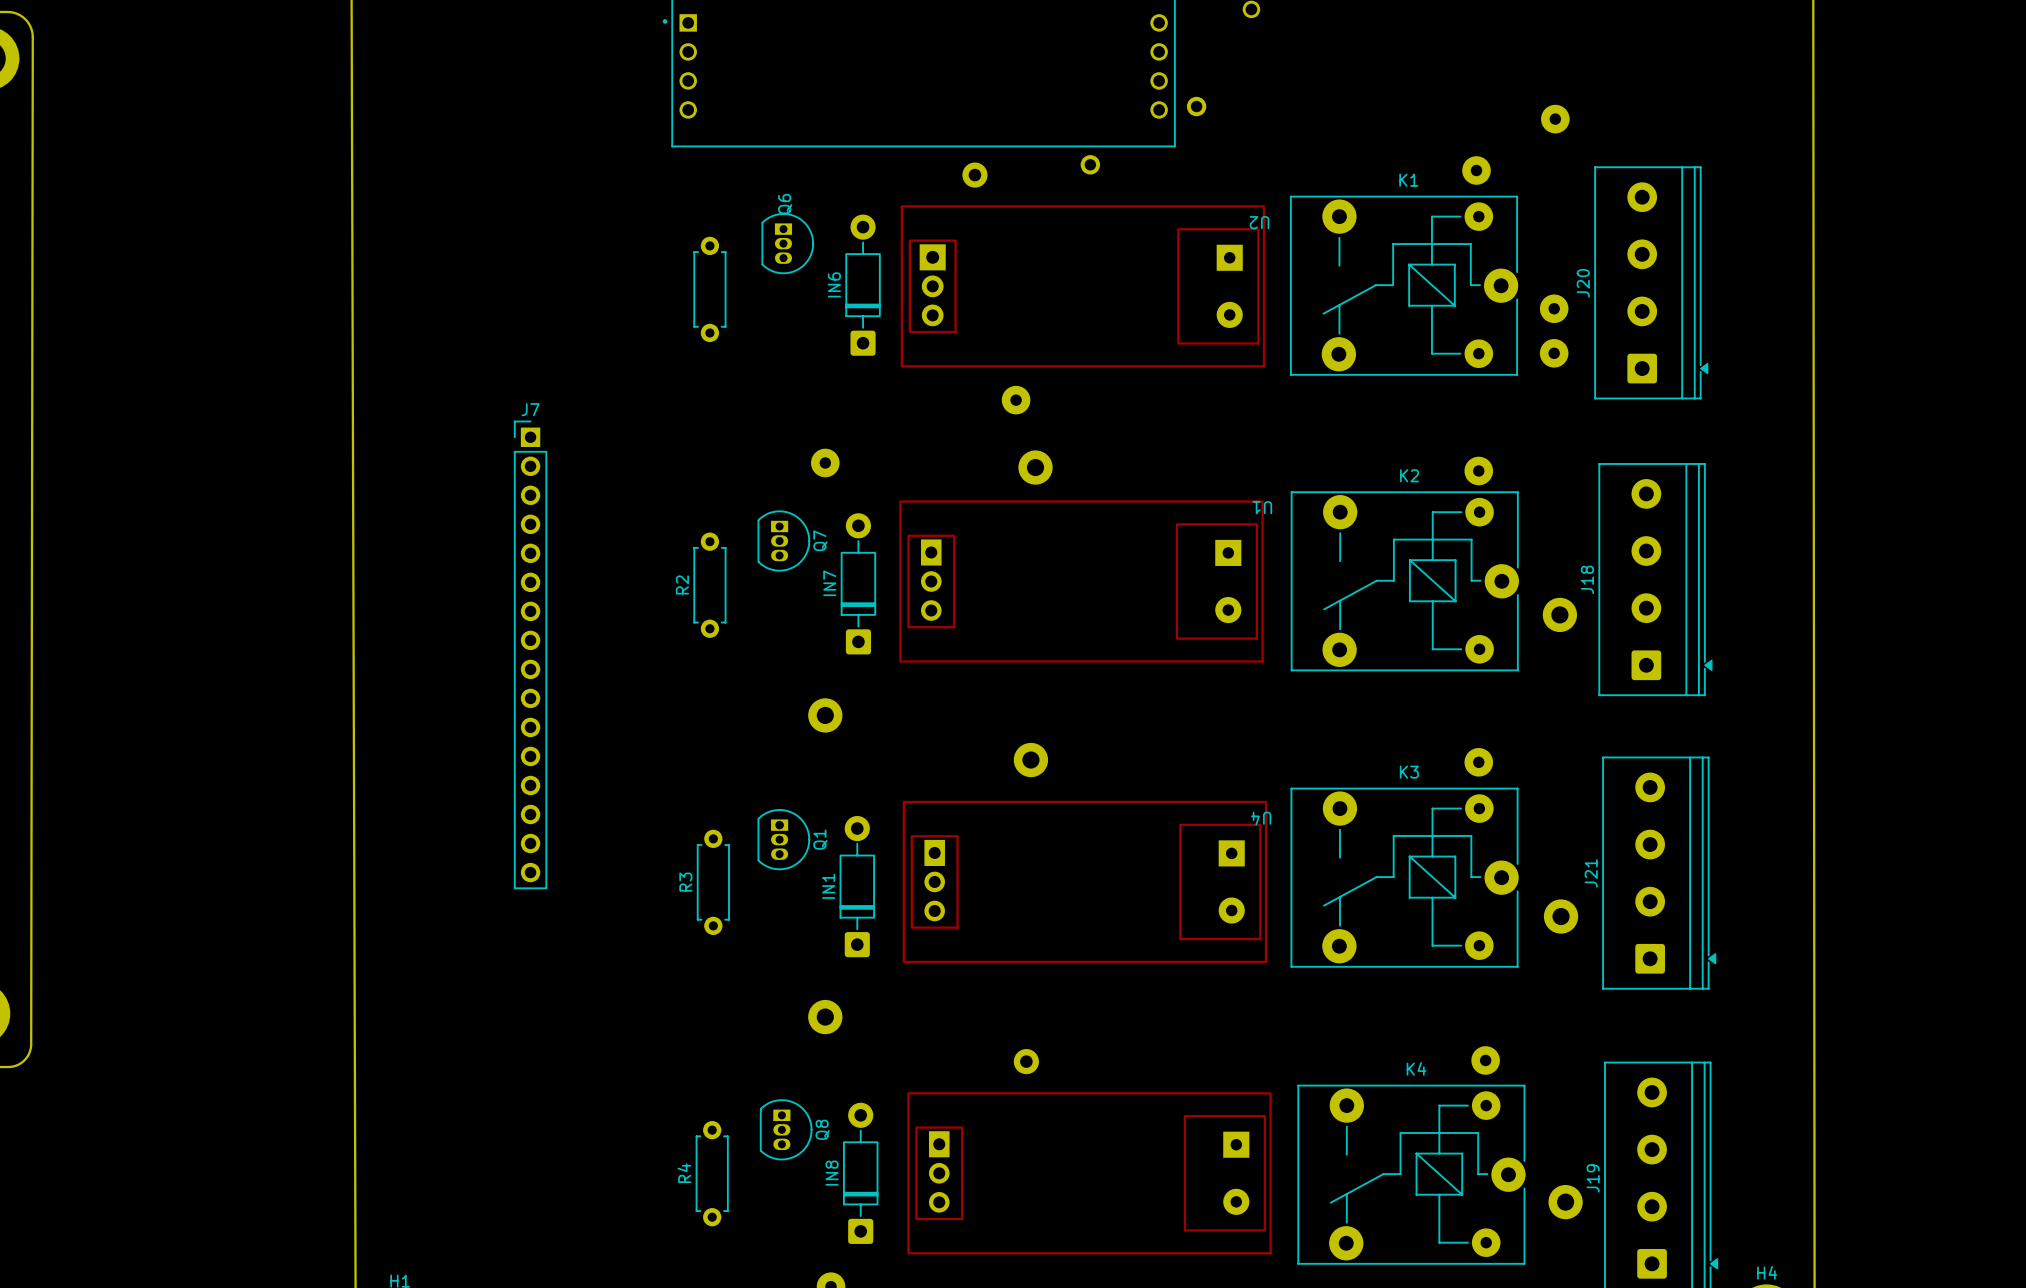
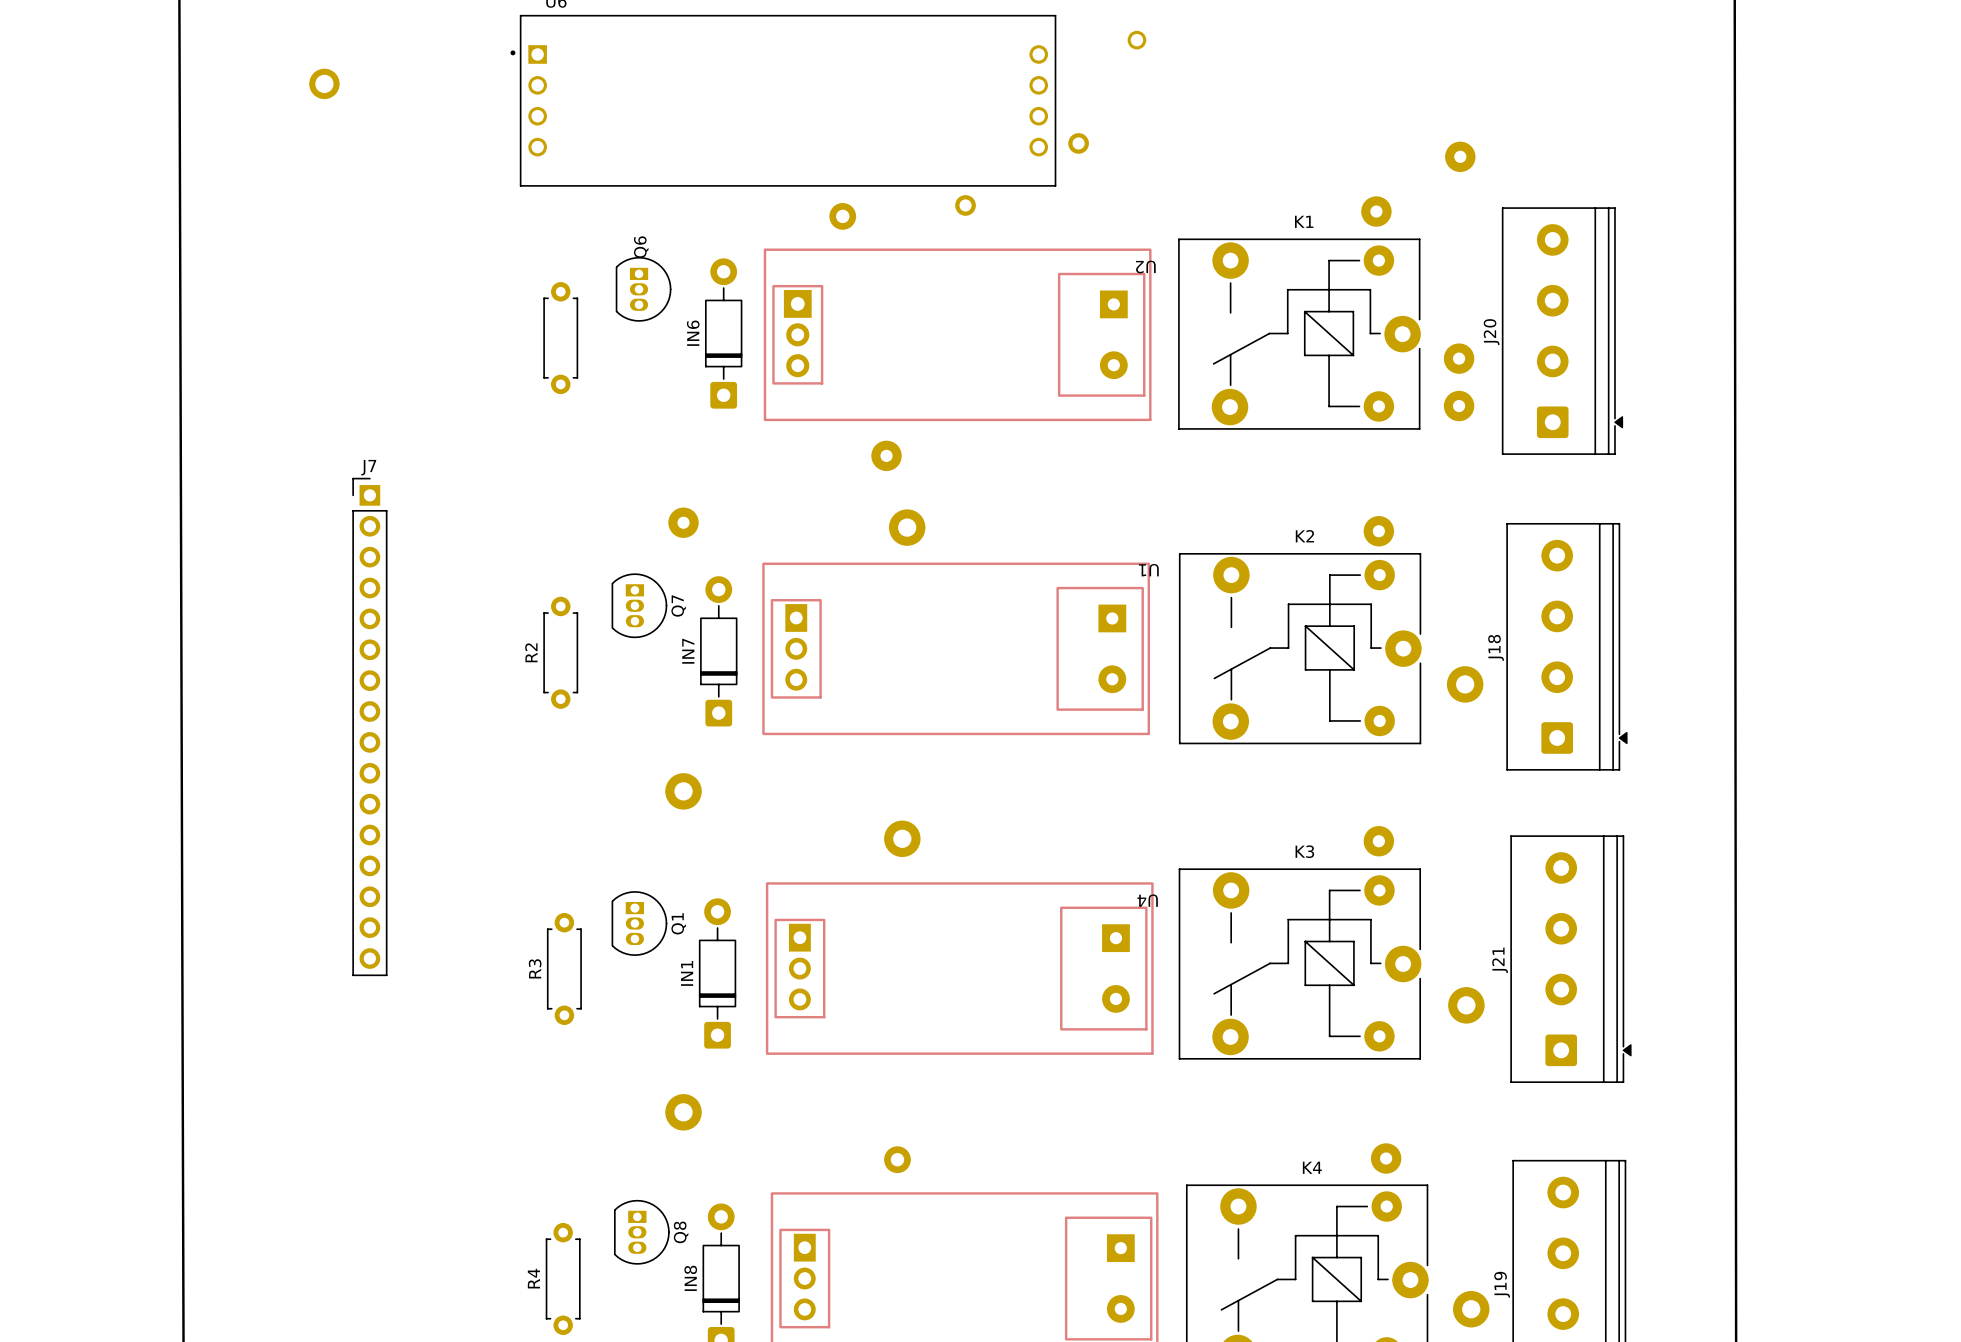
part: none -> (324, 83)

